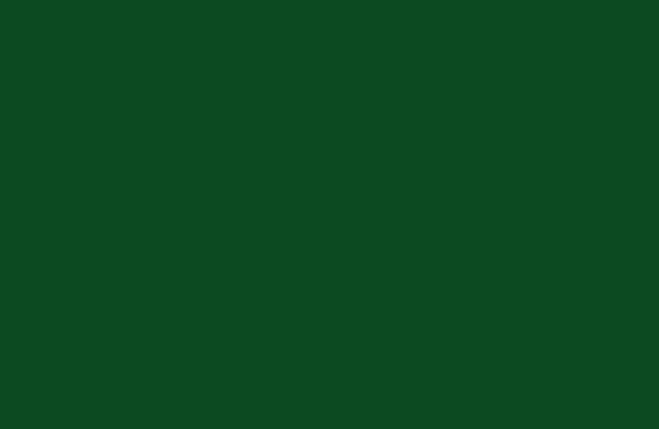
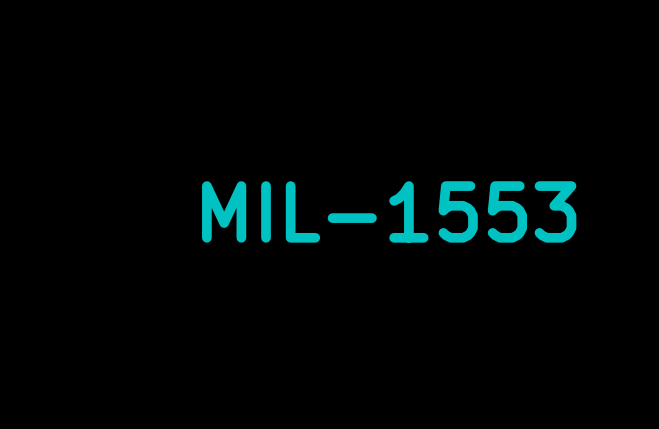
text: none -> MIL-1553 (389, 211)

